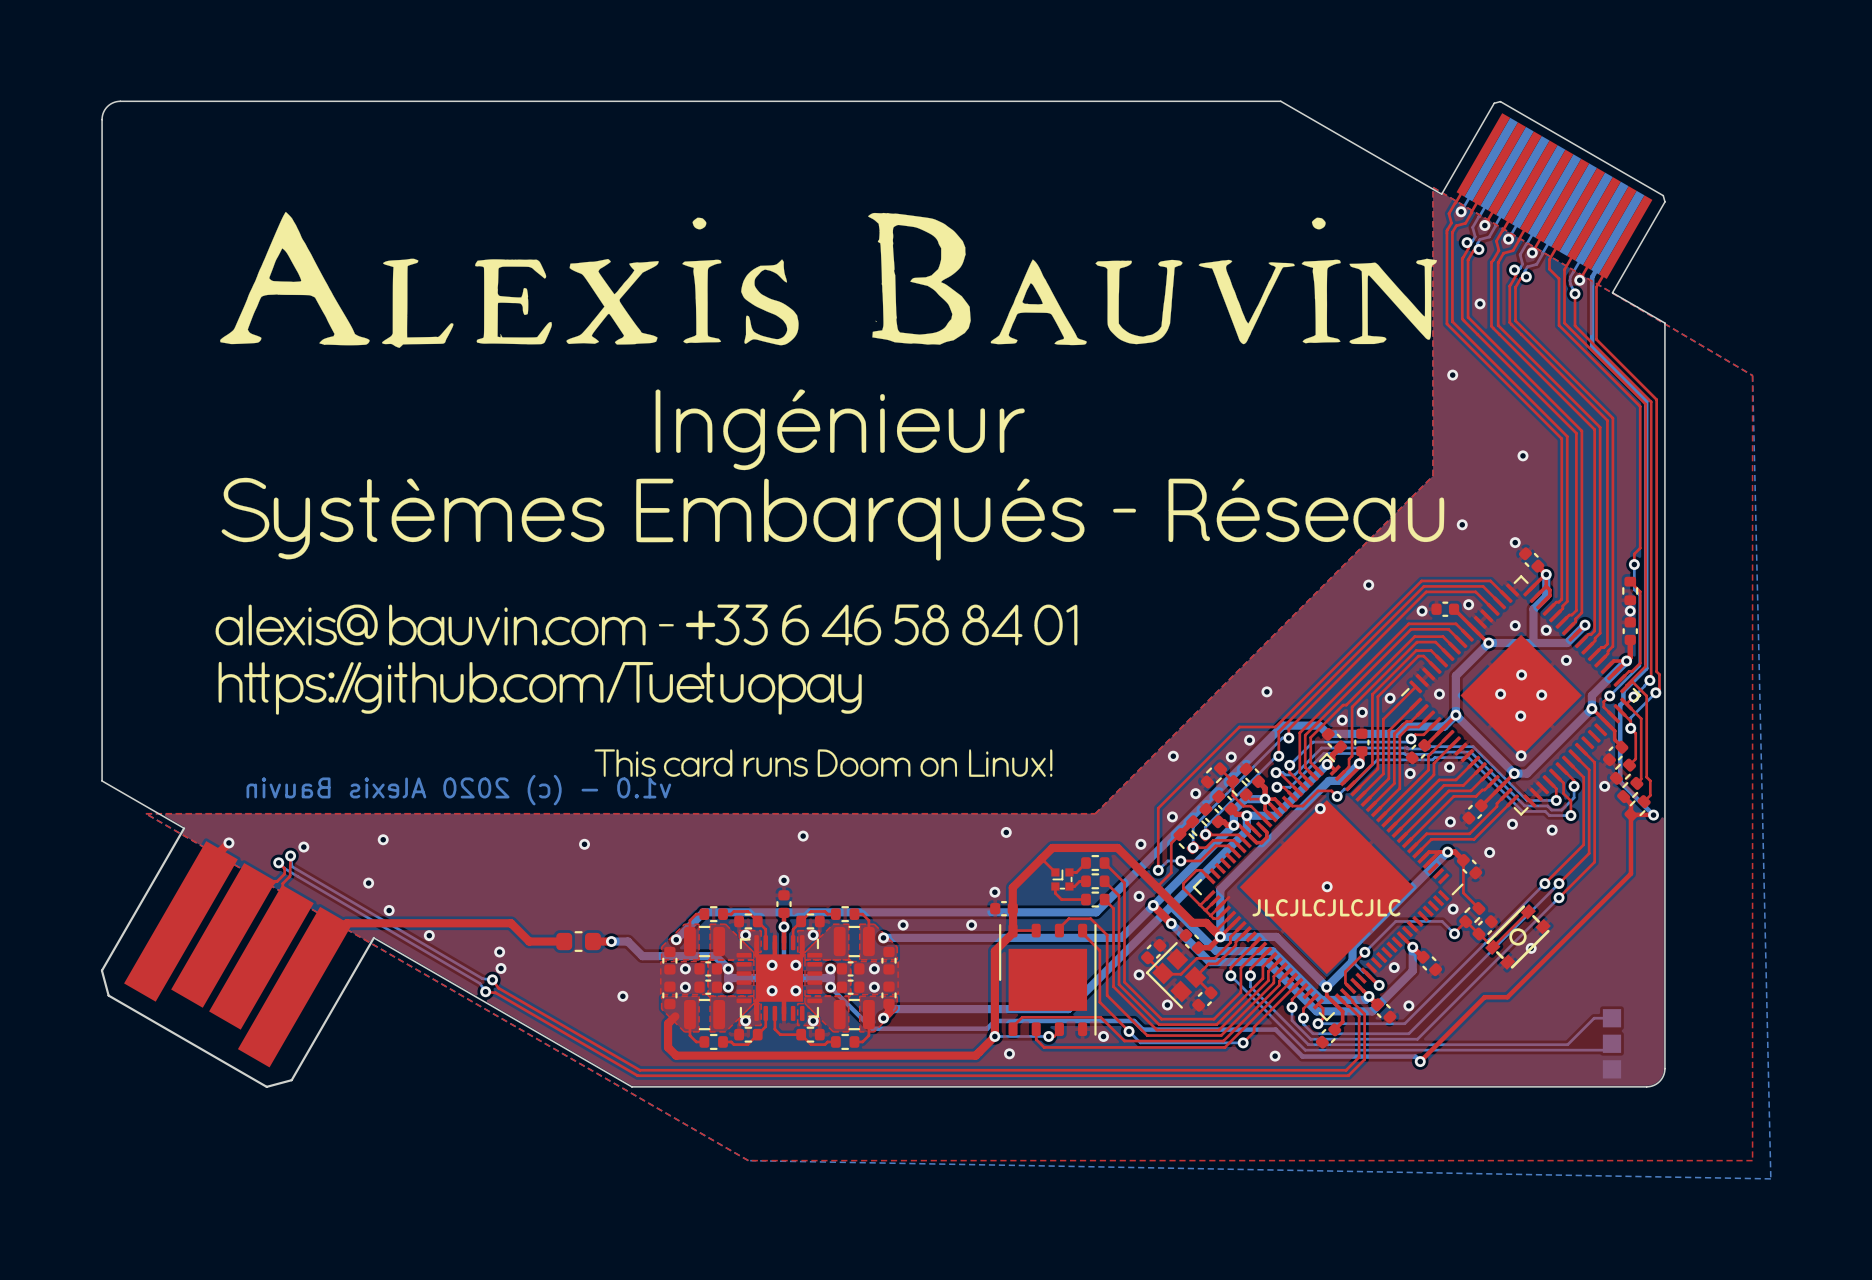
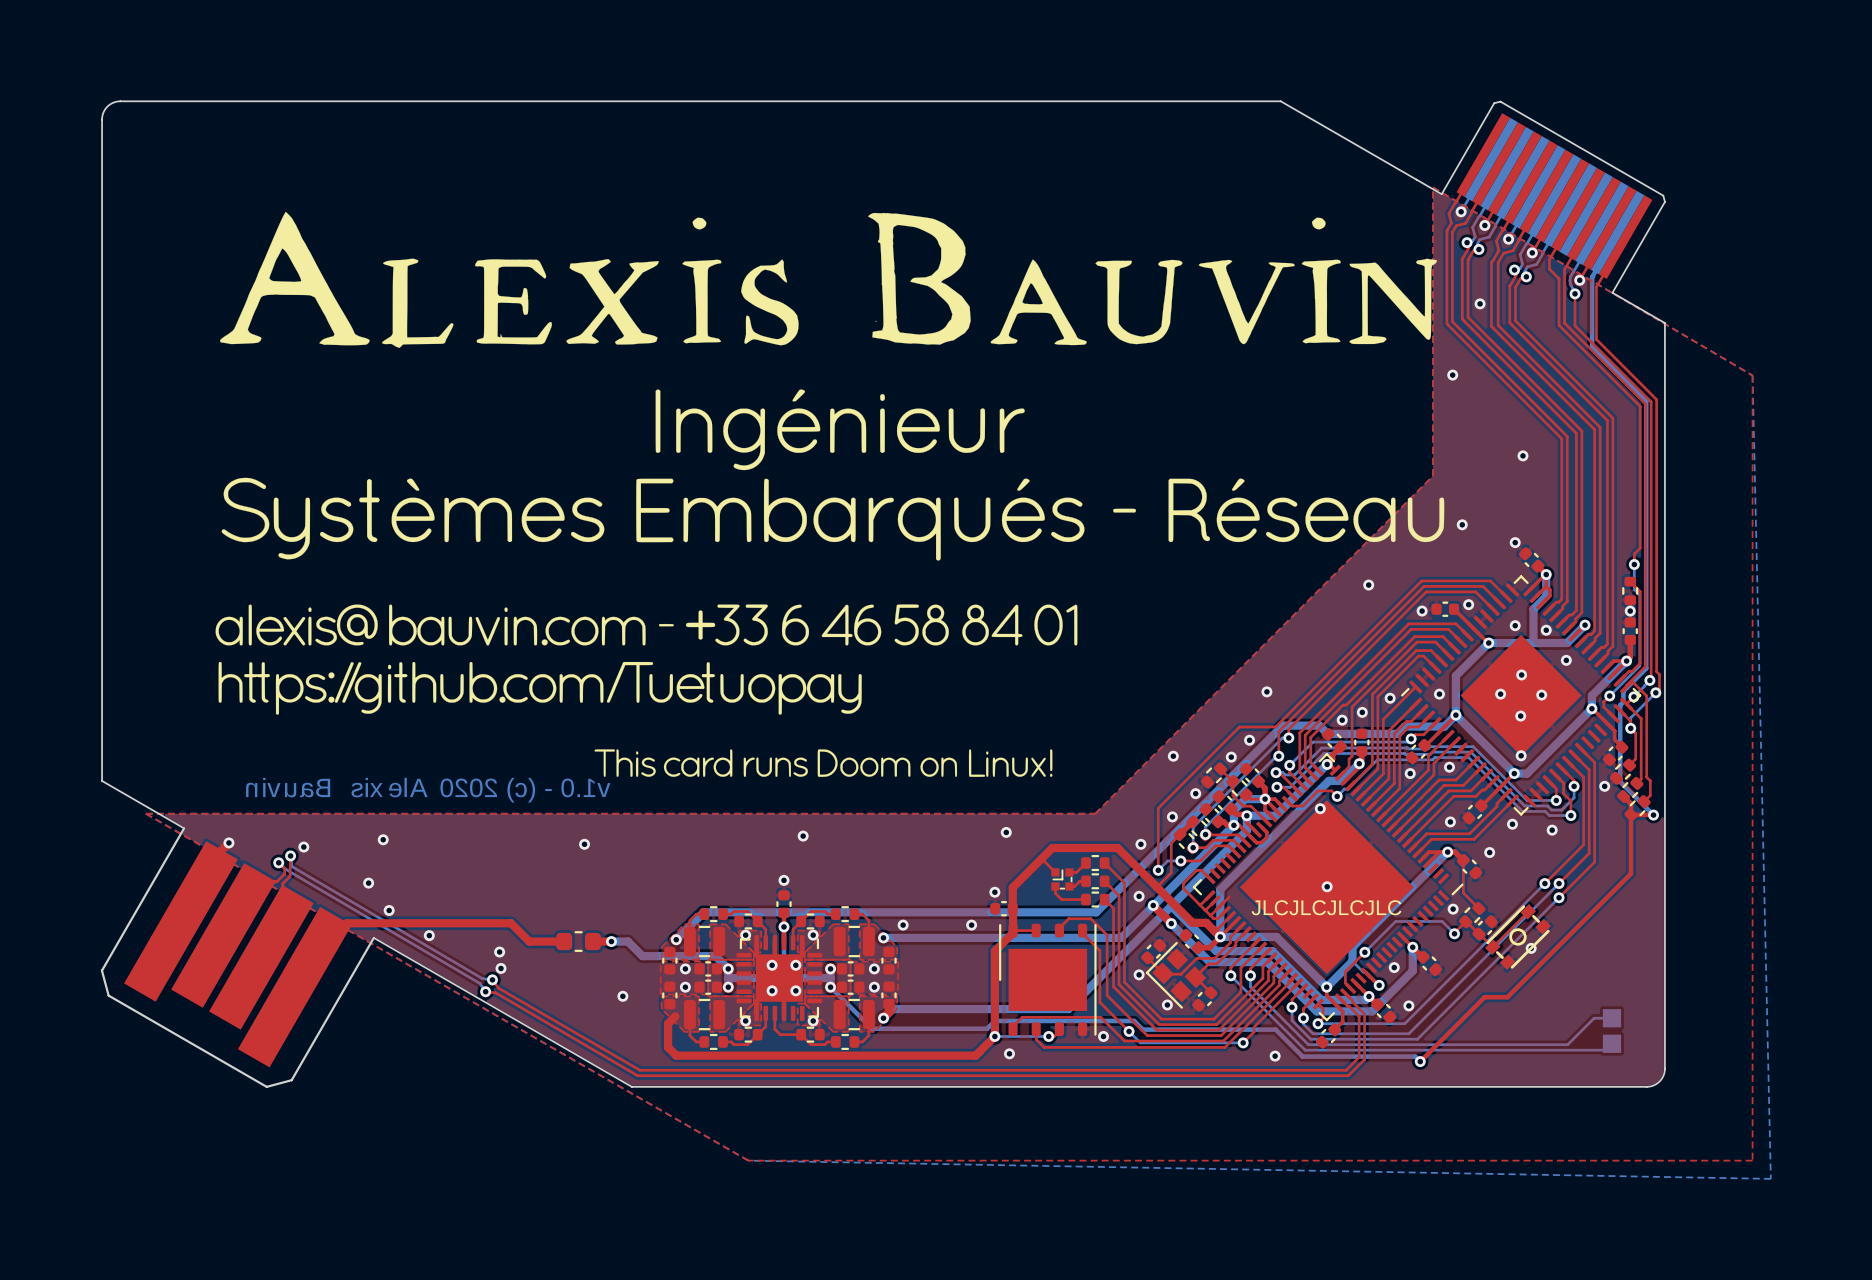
part: (1611, 1069) -> none

